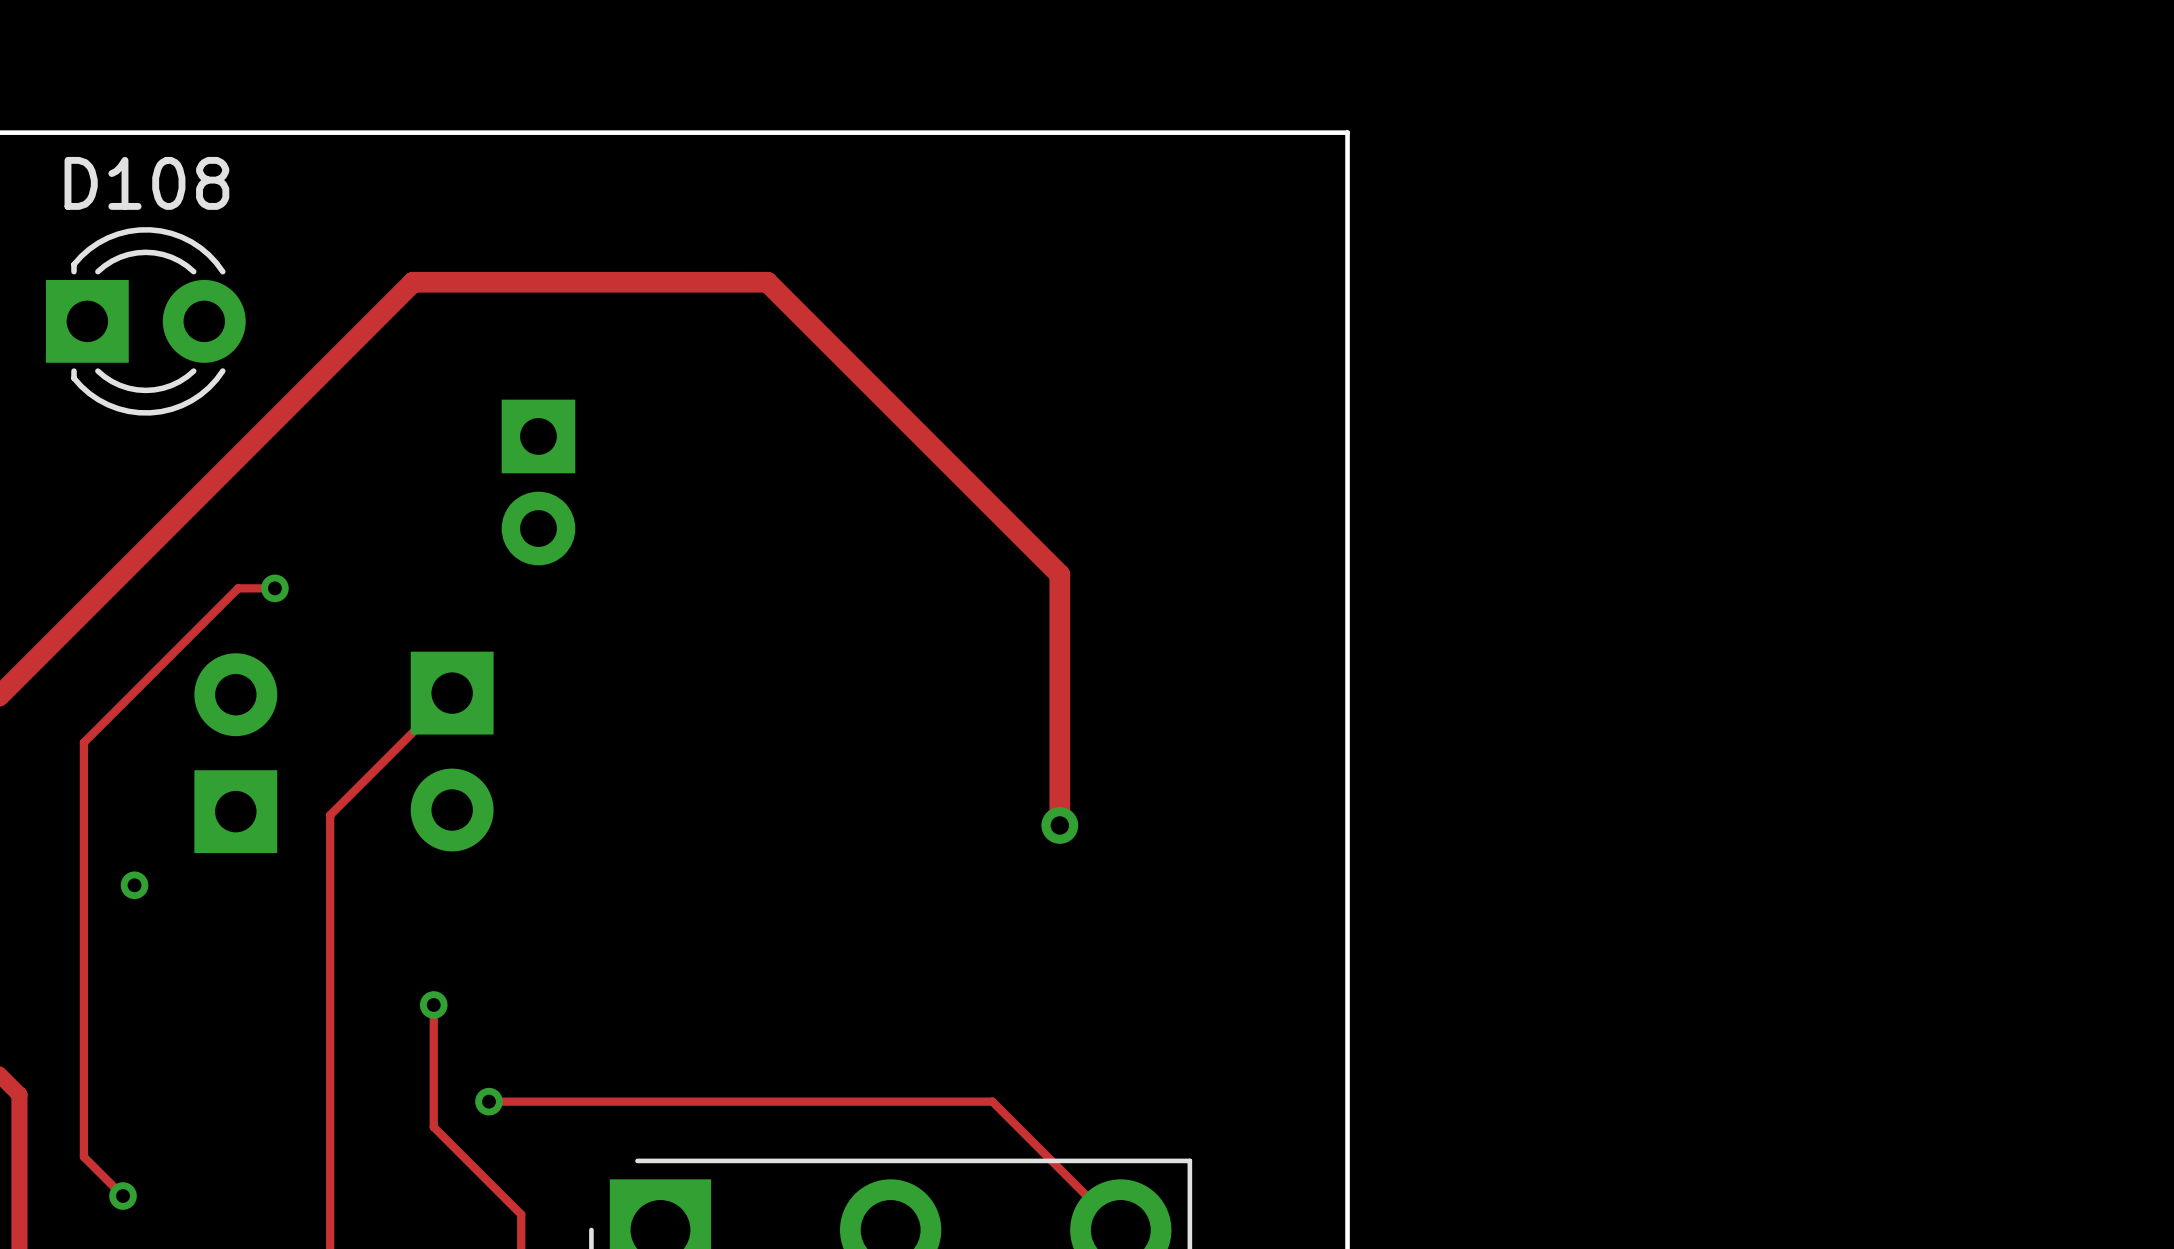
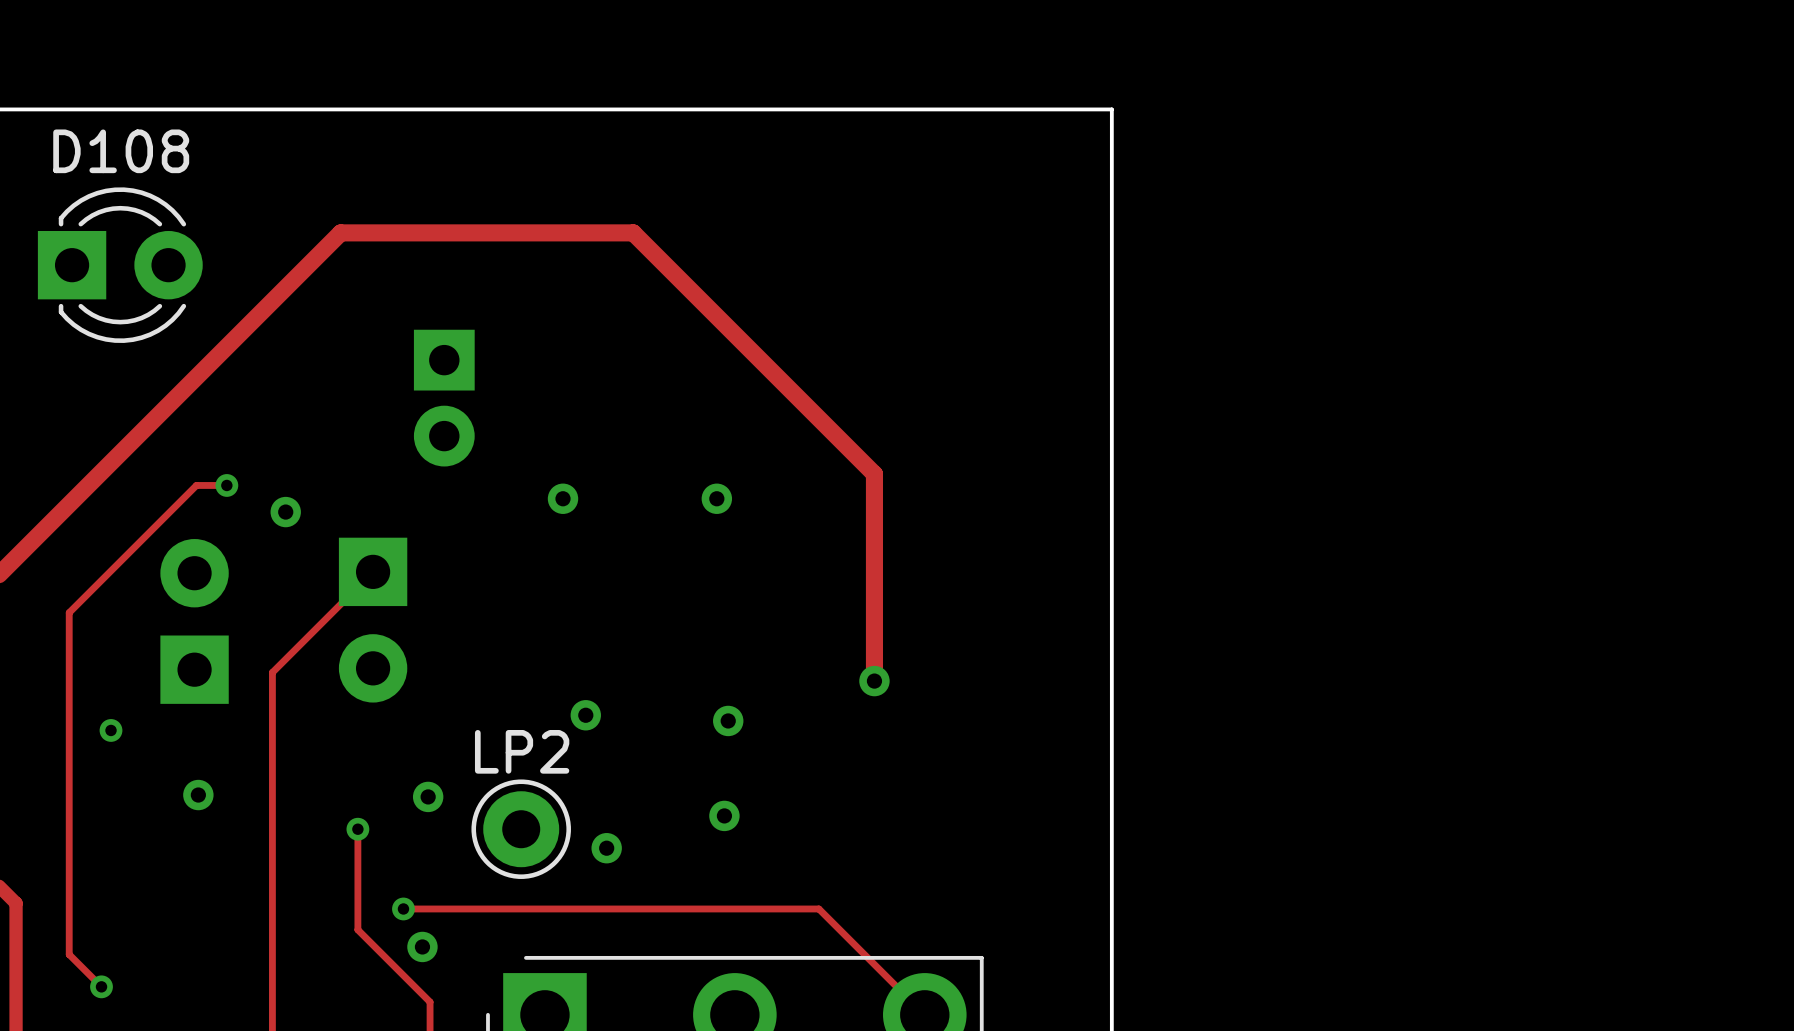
via: none -> (563, 498)
via: none -> (716, 498)
via: none -> (285, 512)
via: none -> (585, 715)
via: none -> (728, 720)
via: none -> (198, 795)
via: none -> (428, 796)
via: none -> (724, 815)
part: none -> LP2 (521, 829)
via: none -> (606, 848)
via: none -> (422, 946)

